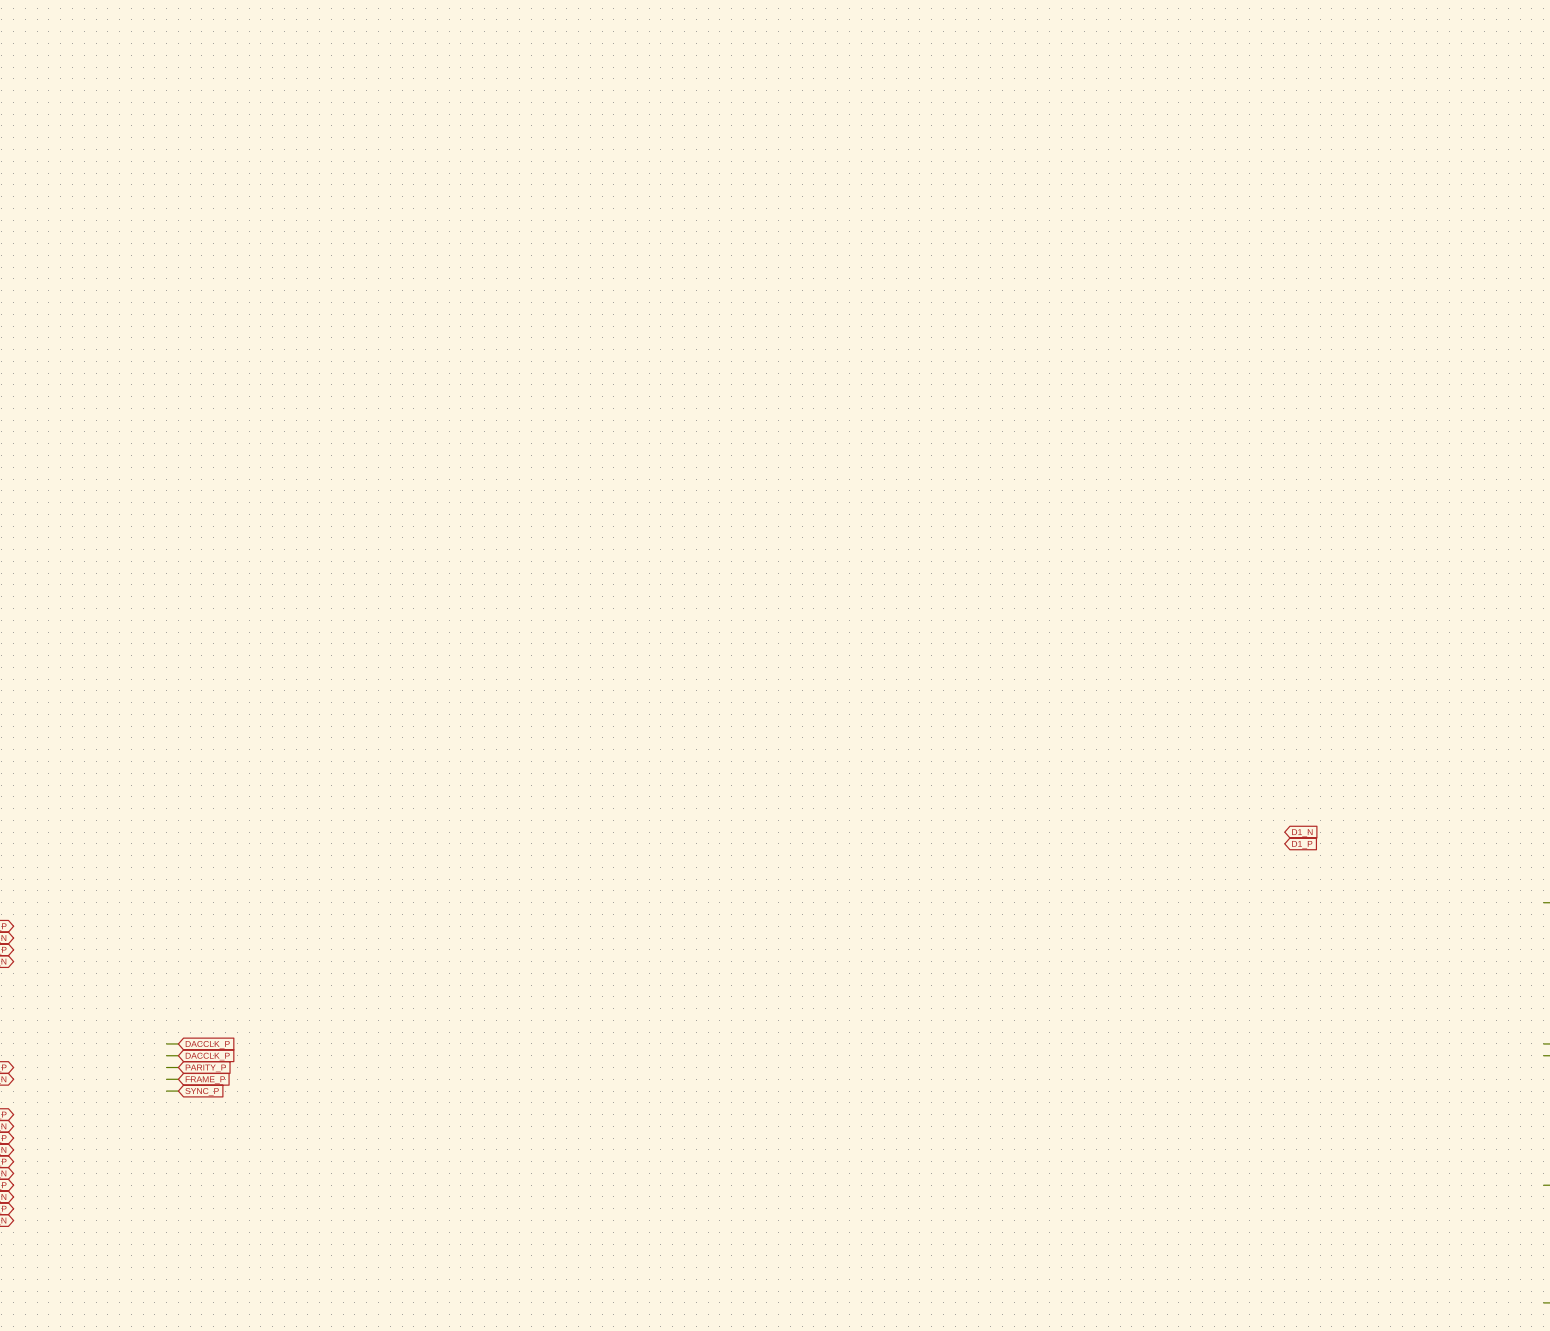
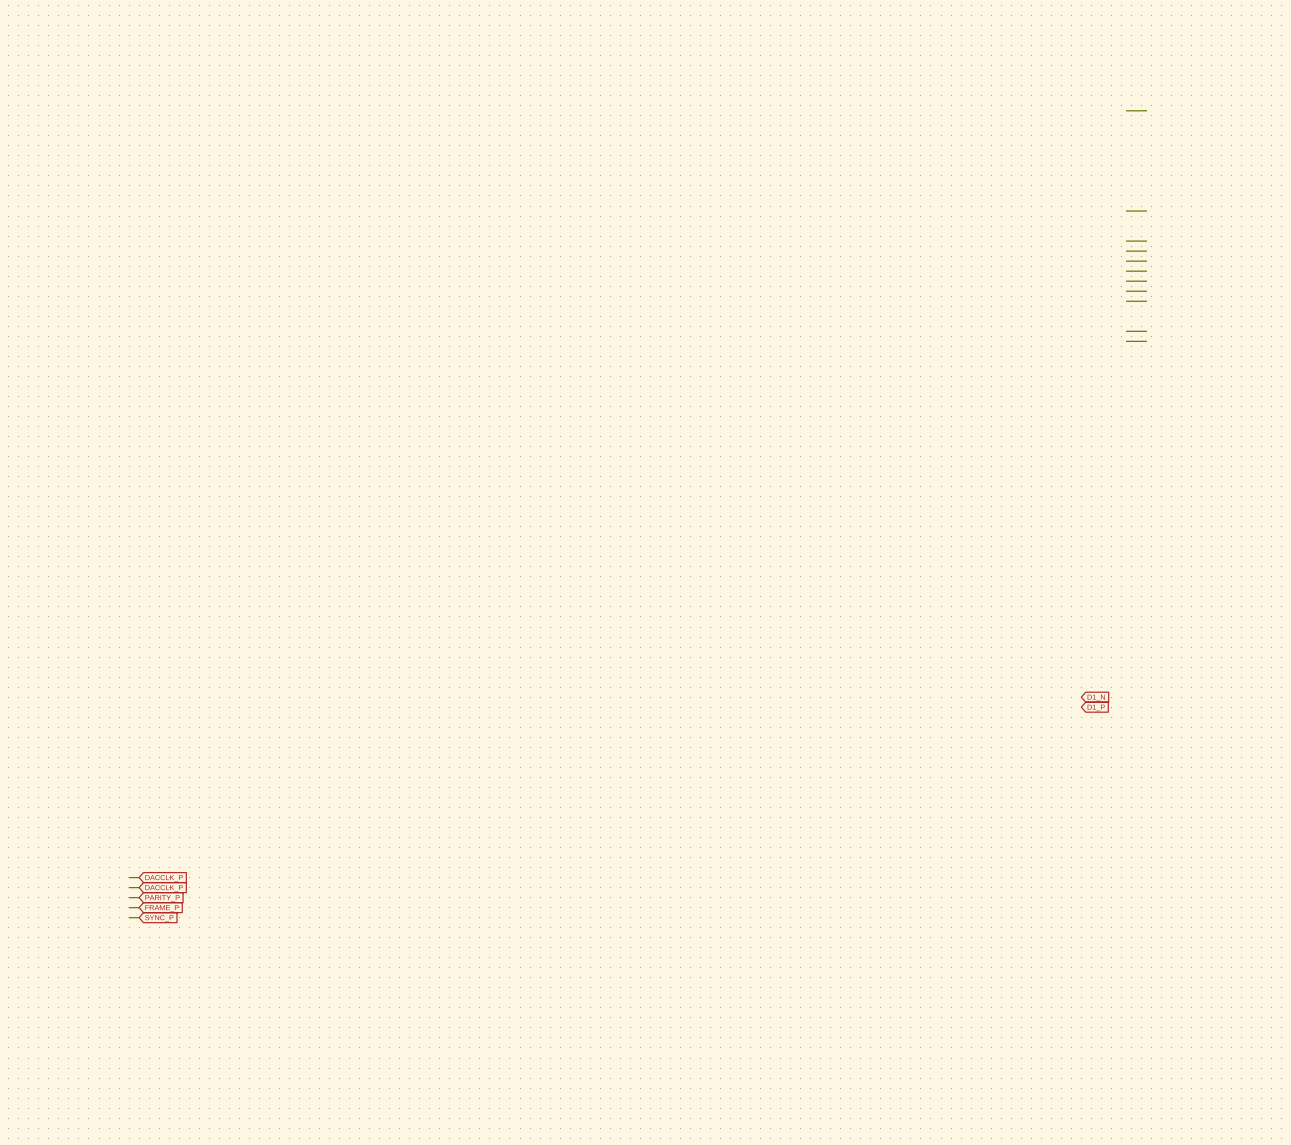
wire: none -> (1126, 110) (1146, 110)
wire: none -> (1126, 211) (1146, 211)
wire: none -> (1126, 241) (1146, 241)
wire: none -> (1126, 251) (1146, 251)
wire: none -> (1126, 261) (1146, 261)
wire: none -> (1126, 271) (1146, 271)
wire: none -> (1126, 281) (1146, 281)
wire: none -> (1126, 291) (1146, 291)
wire: none -> (1126, 301) (1146, 301)
wire: none -> (1126, 331) (1146, 331)
wire: none -> (1126, 341) (1146, 341)

